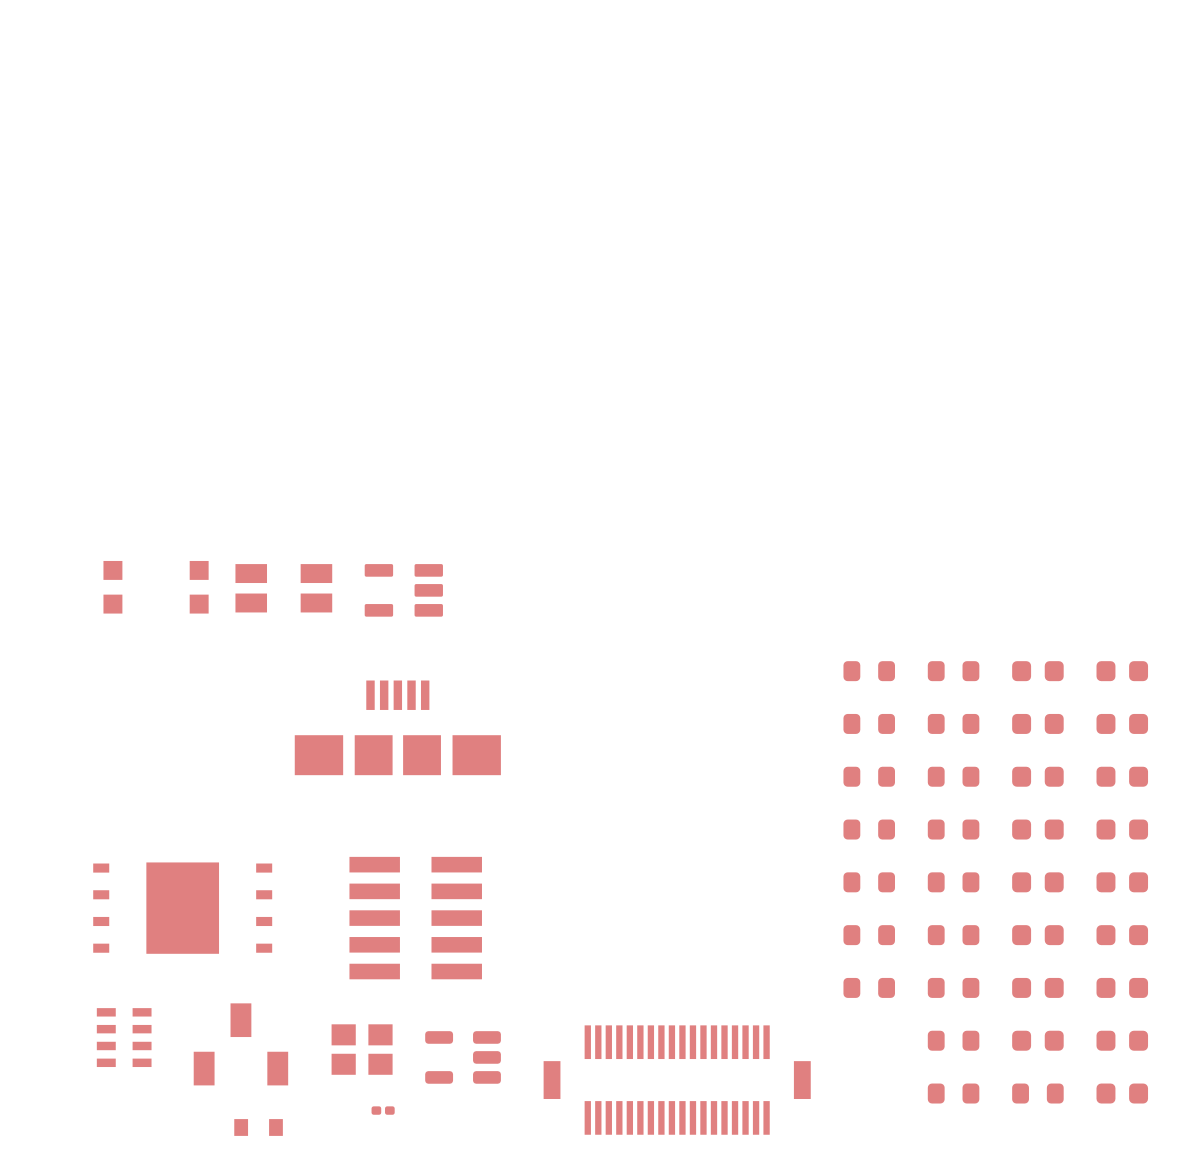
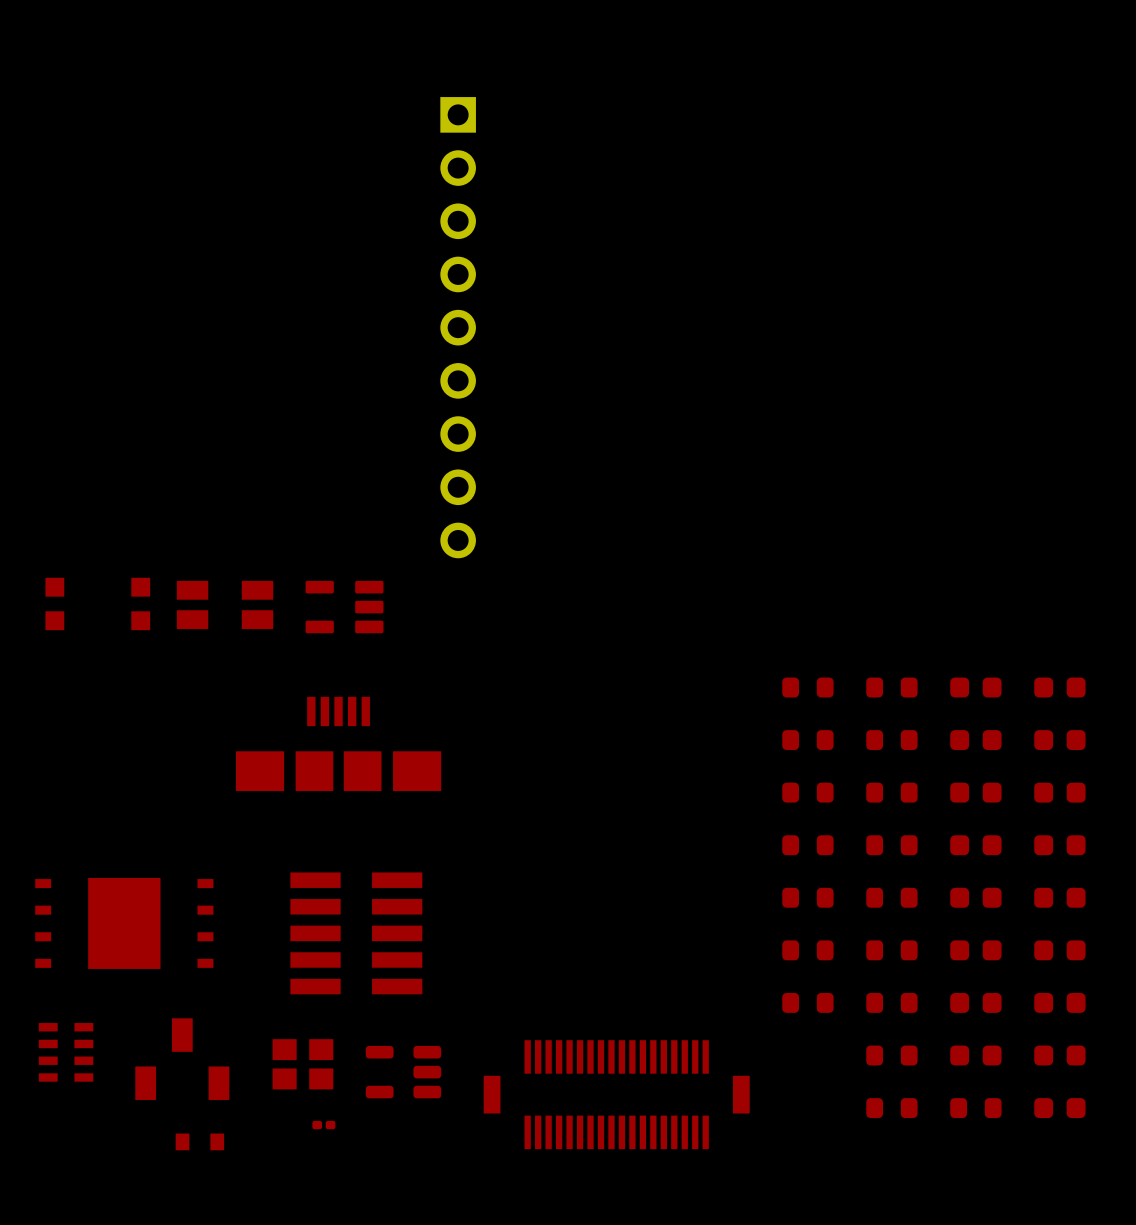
part: none -> (458, 327)

